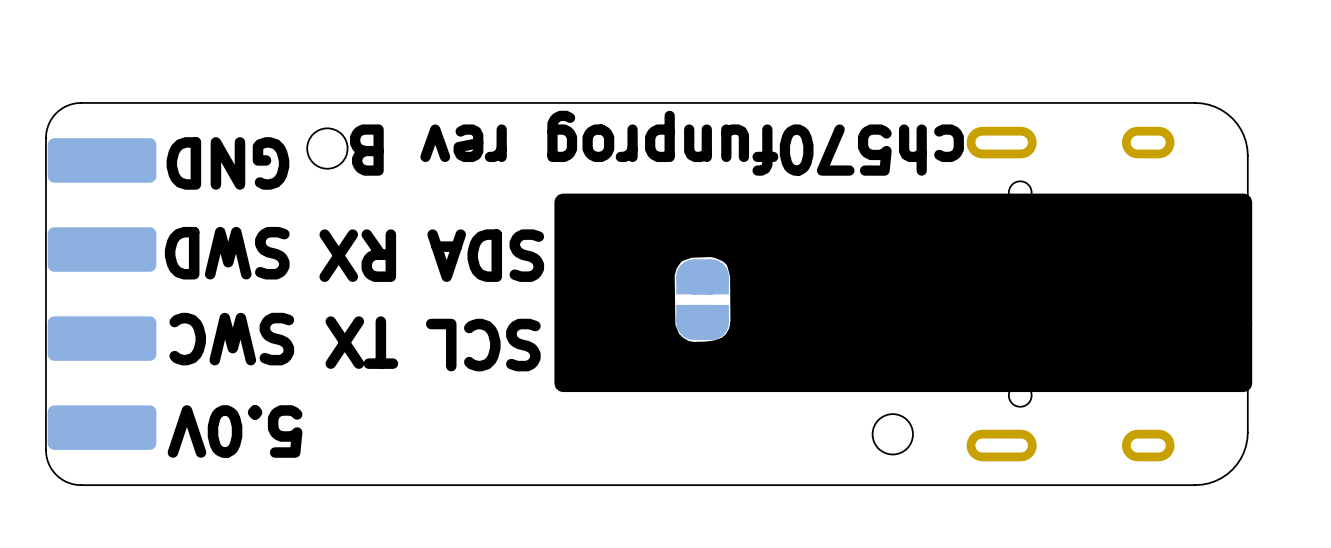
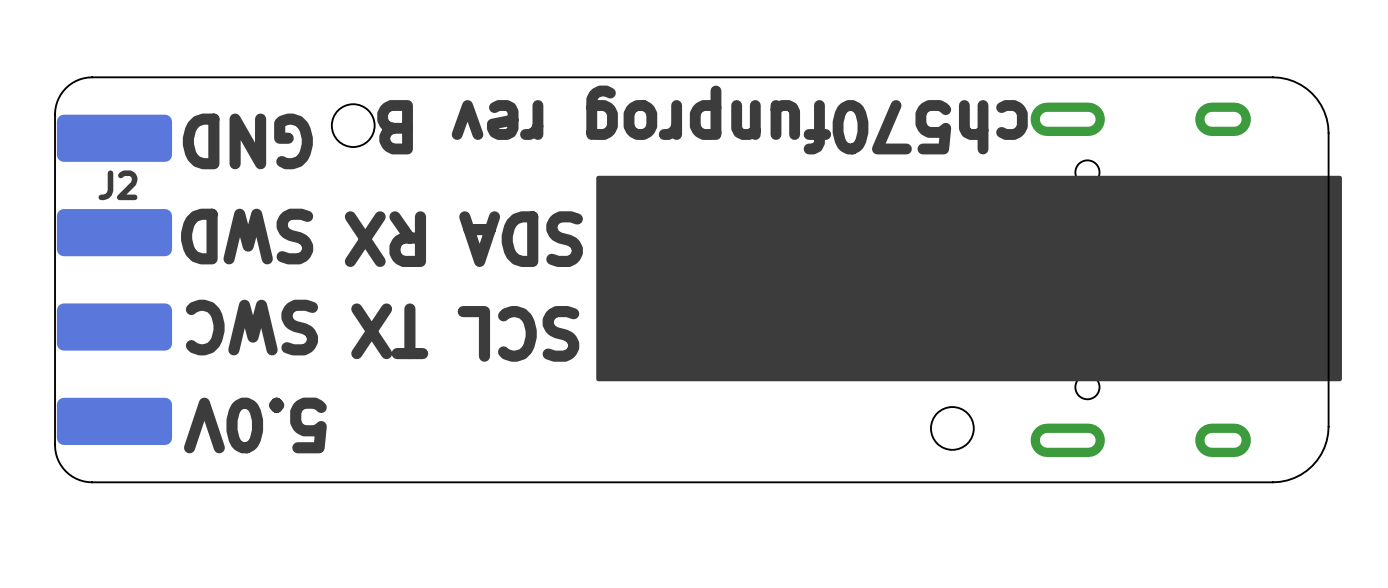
drawing shape: [554, 193, 1253, 393] -> [596, 175, 1342, 382]
J2 name: none -> J2 (117, 185)
part: (702, 299) -> none

